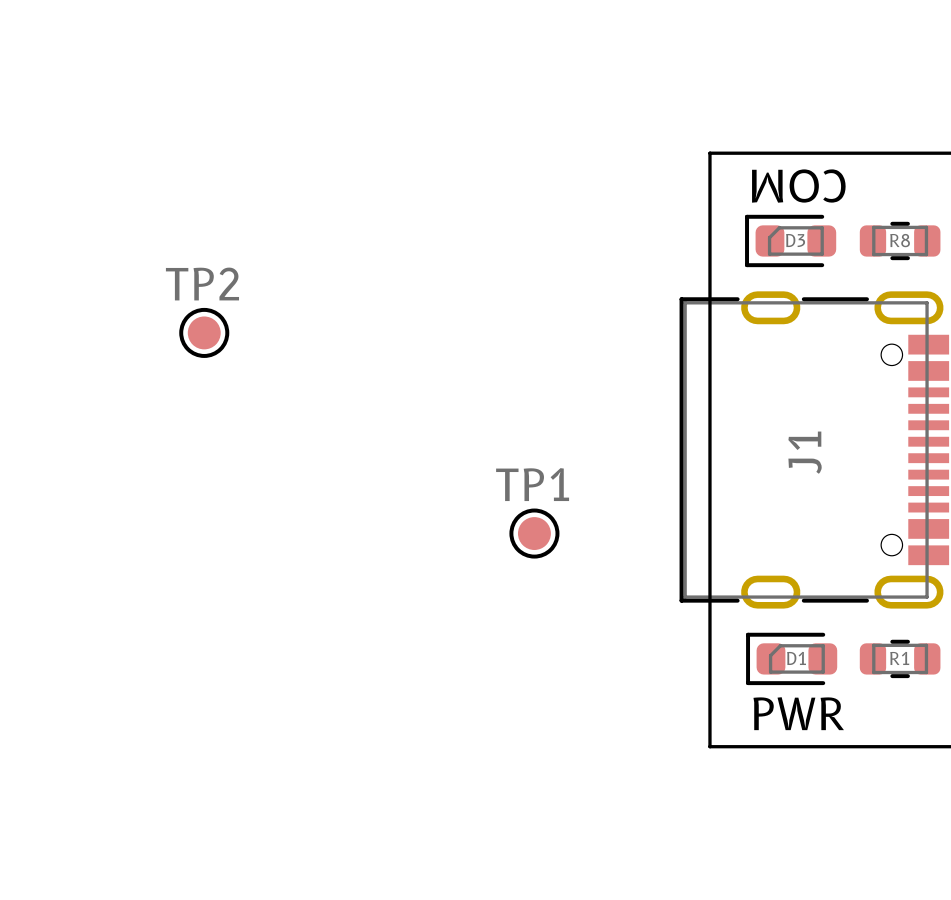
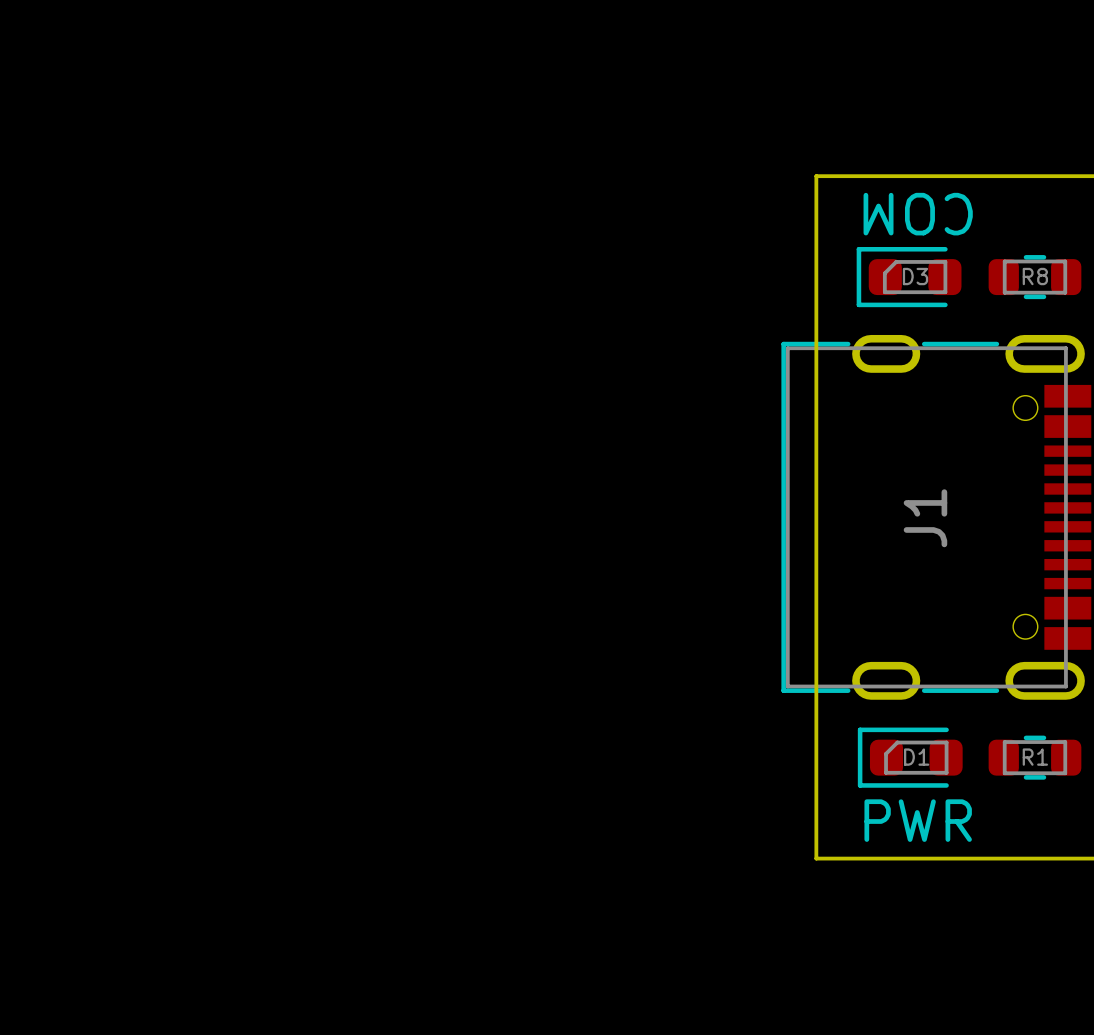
TP2: (204, 332) -> none
TP1: (534, 533) -> none

